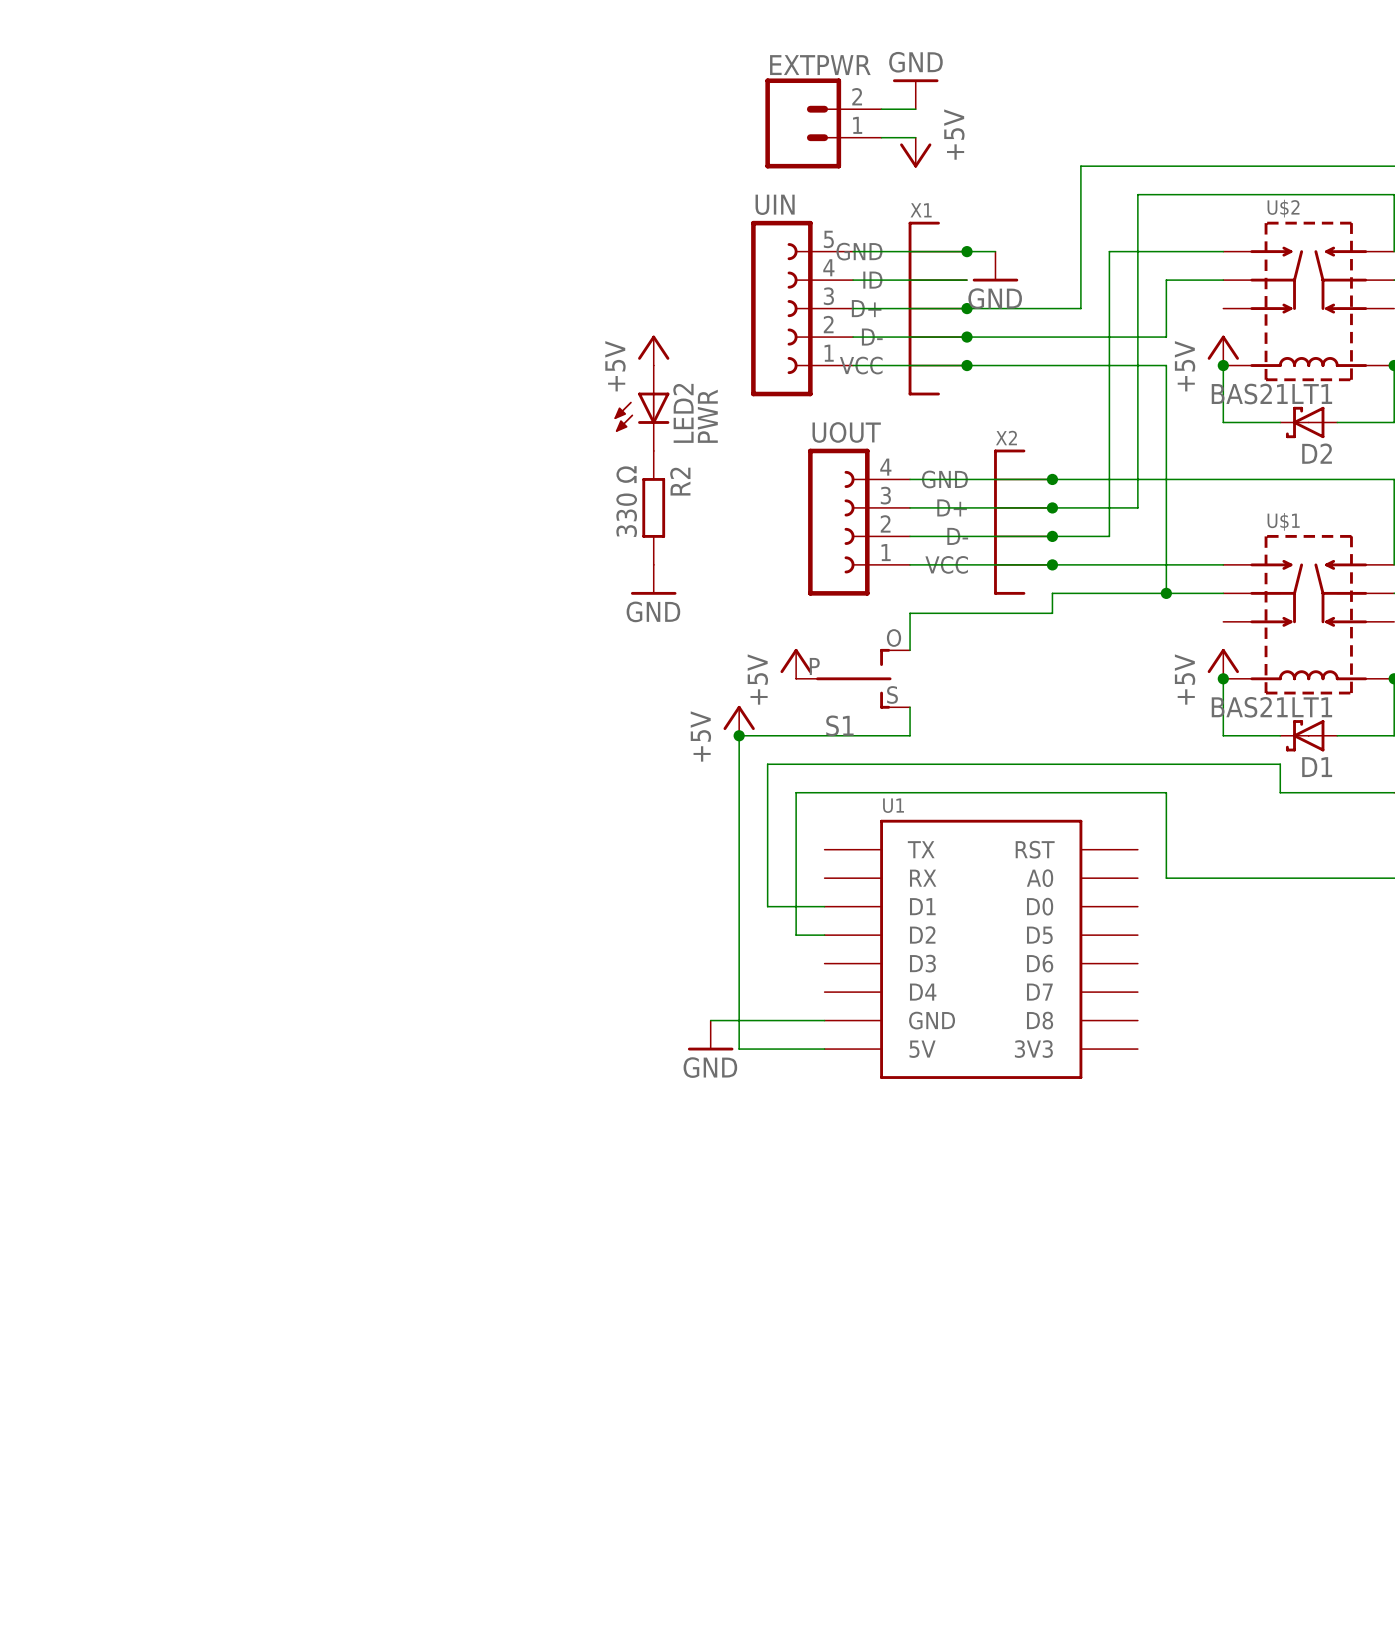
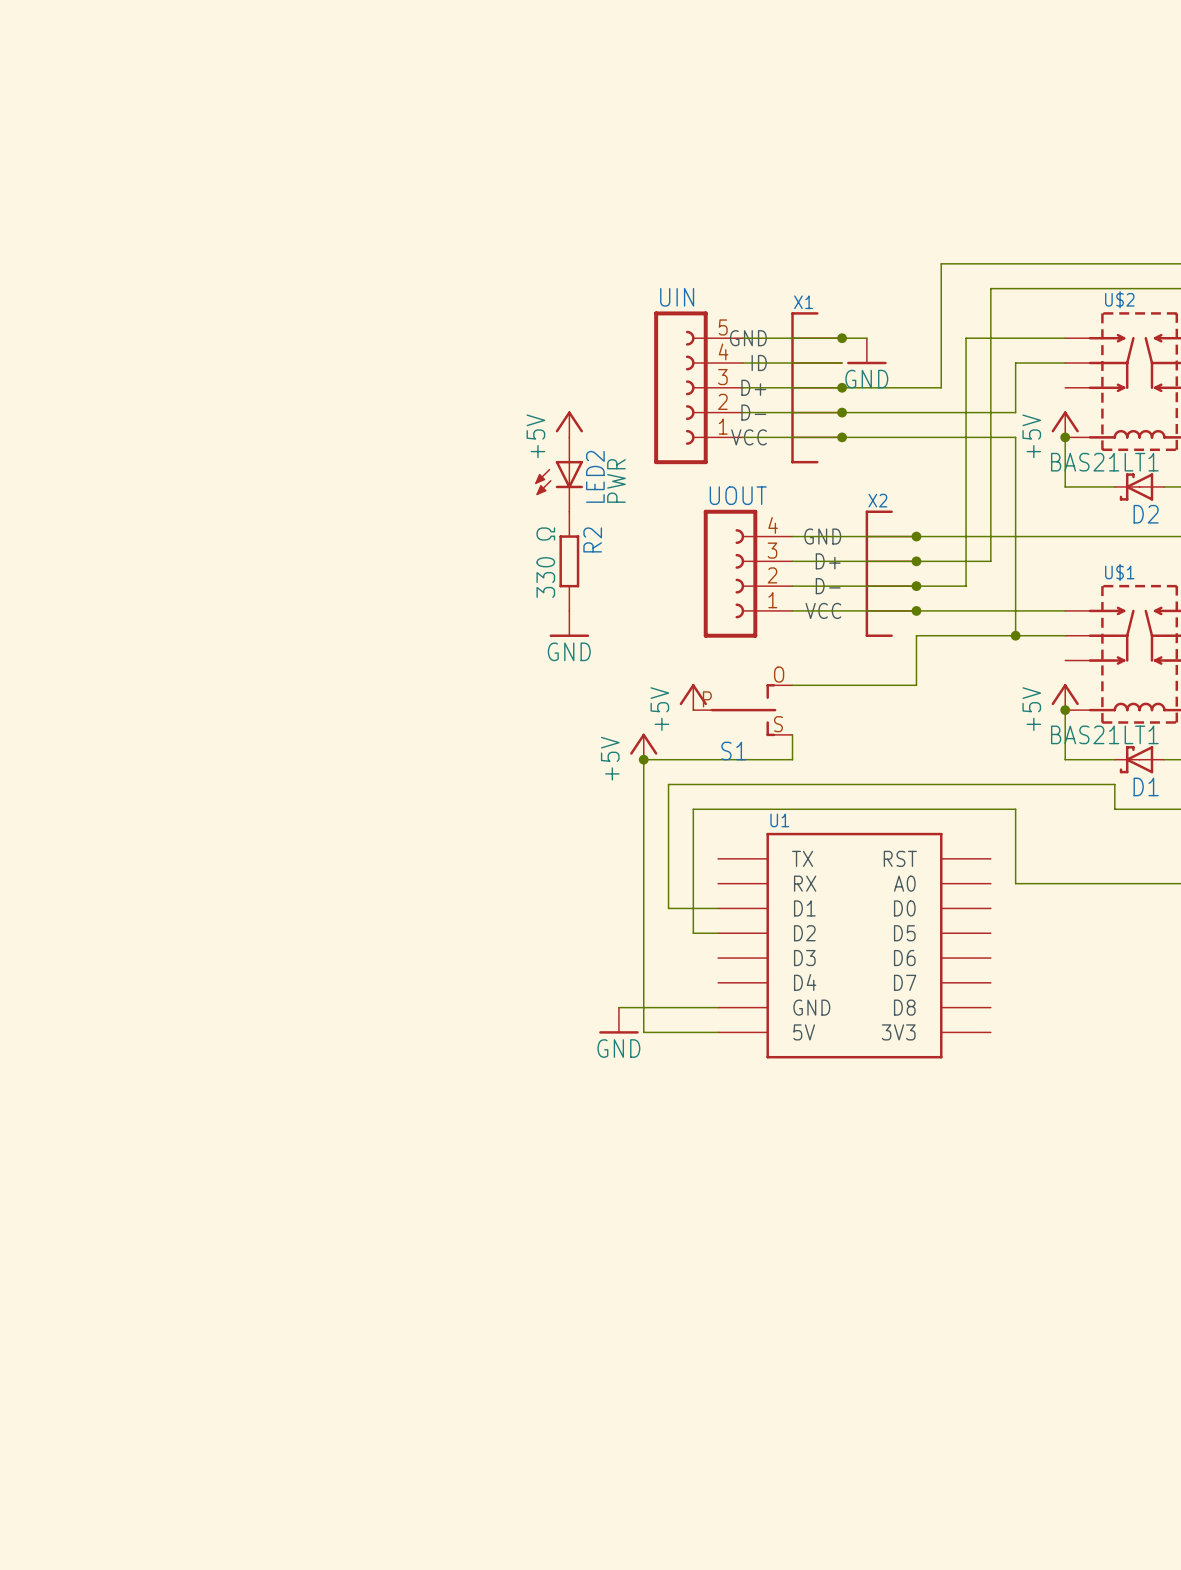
power symbol: GND (915, 94) -> none
wire: (881, 109) (915, 109) -> none
EXTPWR: (823, 123) -> none
wire: (881, 137) (915, 137) -> none
power symbol: +5V (915, 152) -> none
wire: (1052, 613) (910, 613) (910, 650) -> (916, 653) (916, 685) (792, 685)

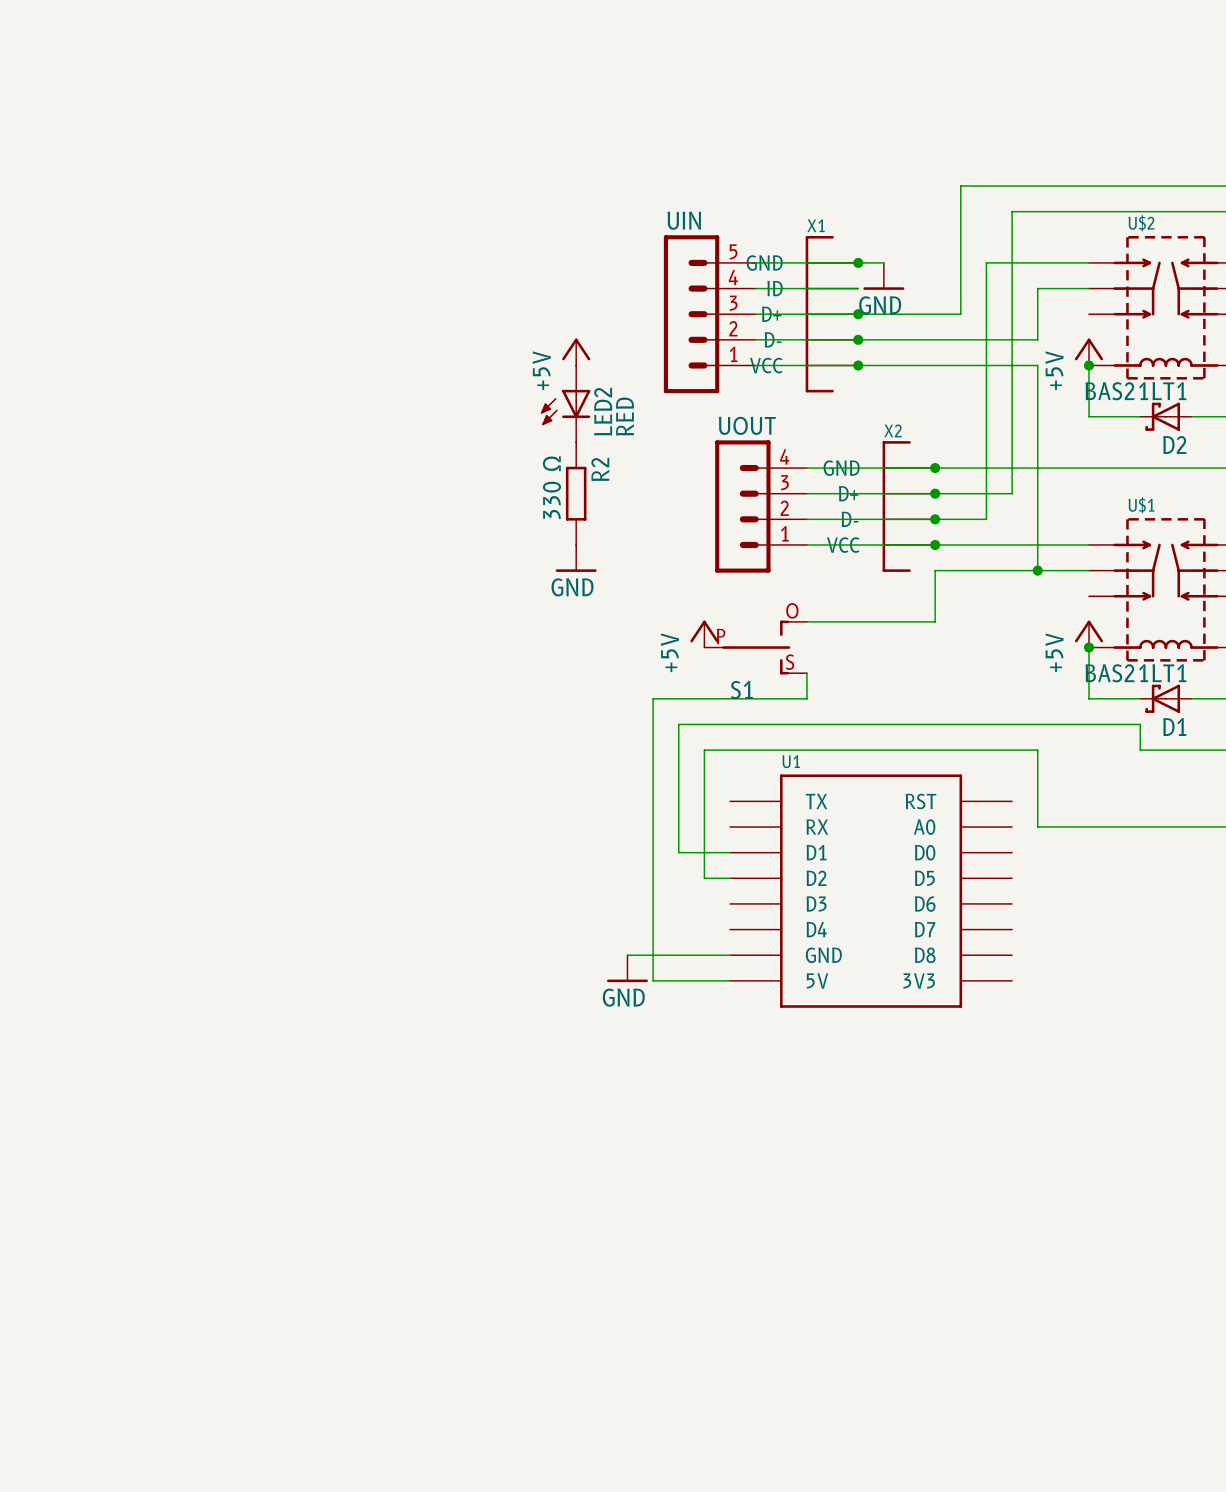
UIN symbol: [654, 311, 743, 465] -> [663, 235, 756, 394]
LED2 value: PWR (616, 480) -> RED (624, 416)
UOUT symbol: [703, 509, 793, 638] -> [715, 440, 807, 573]
power symbol: +5V (643, 746) -> none
junction: (643, 759) -> none

